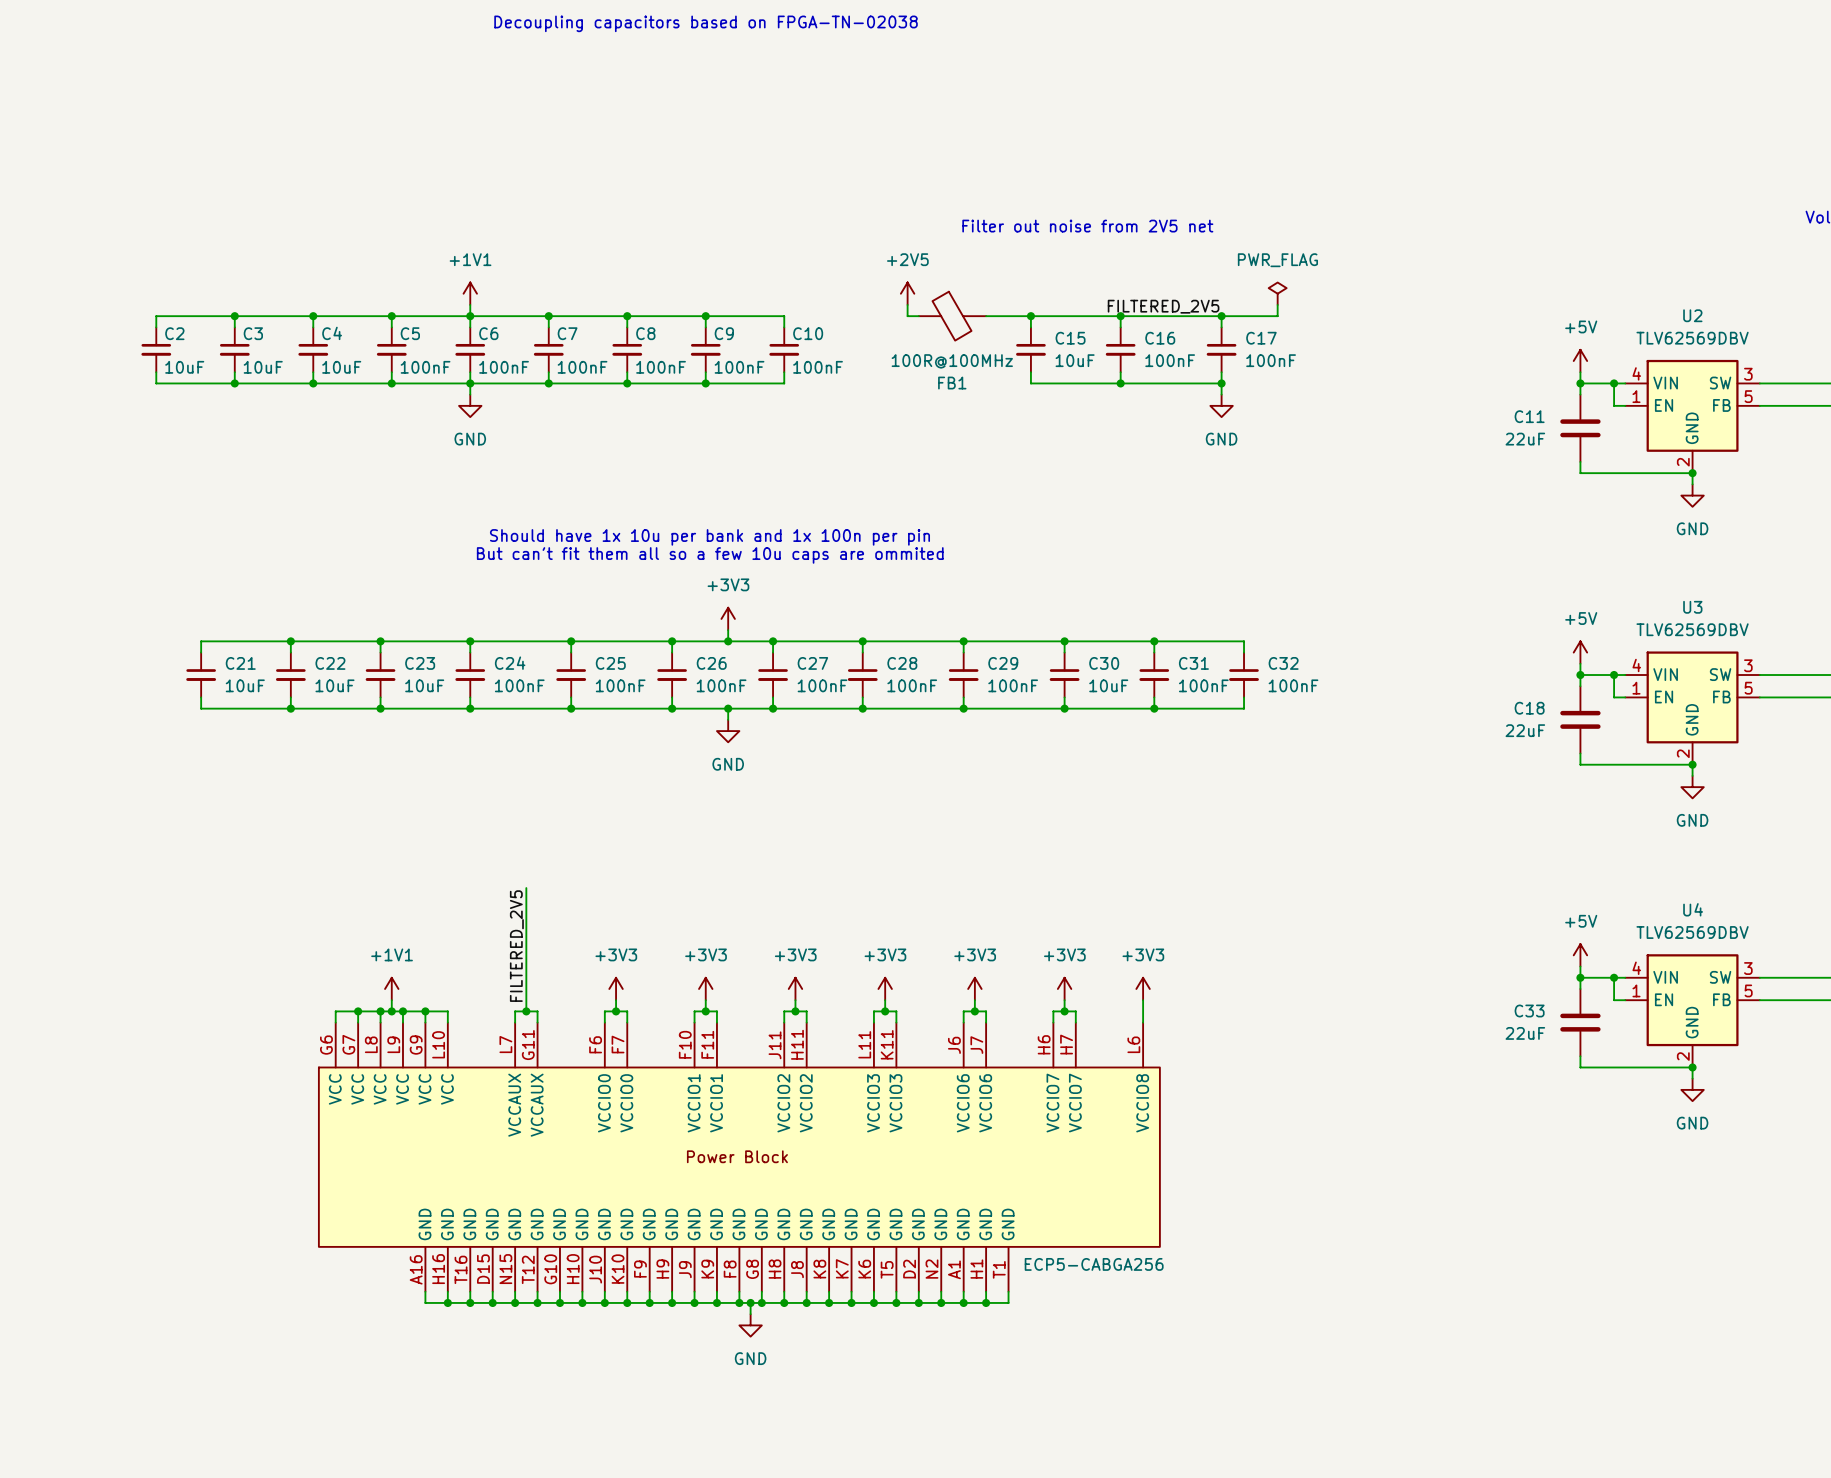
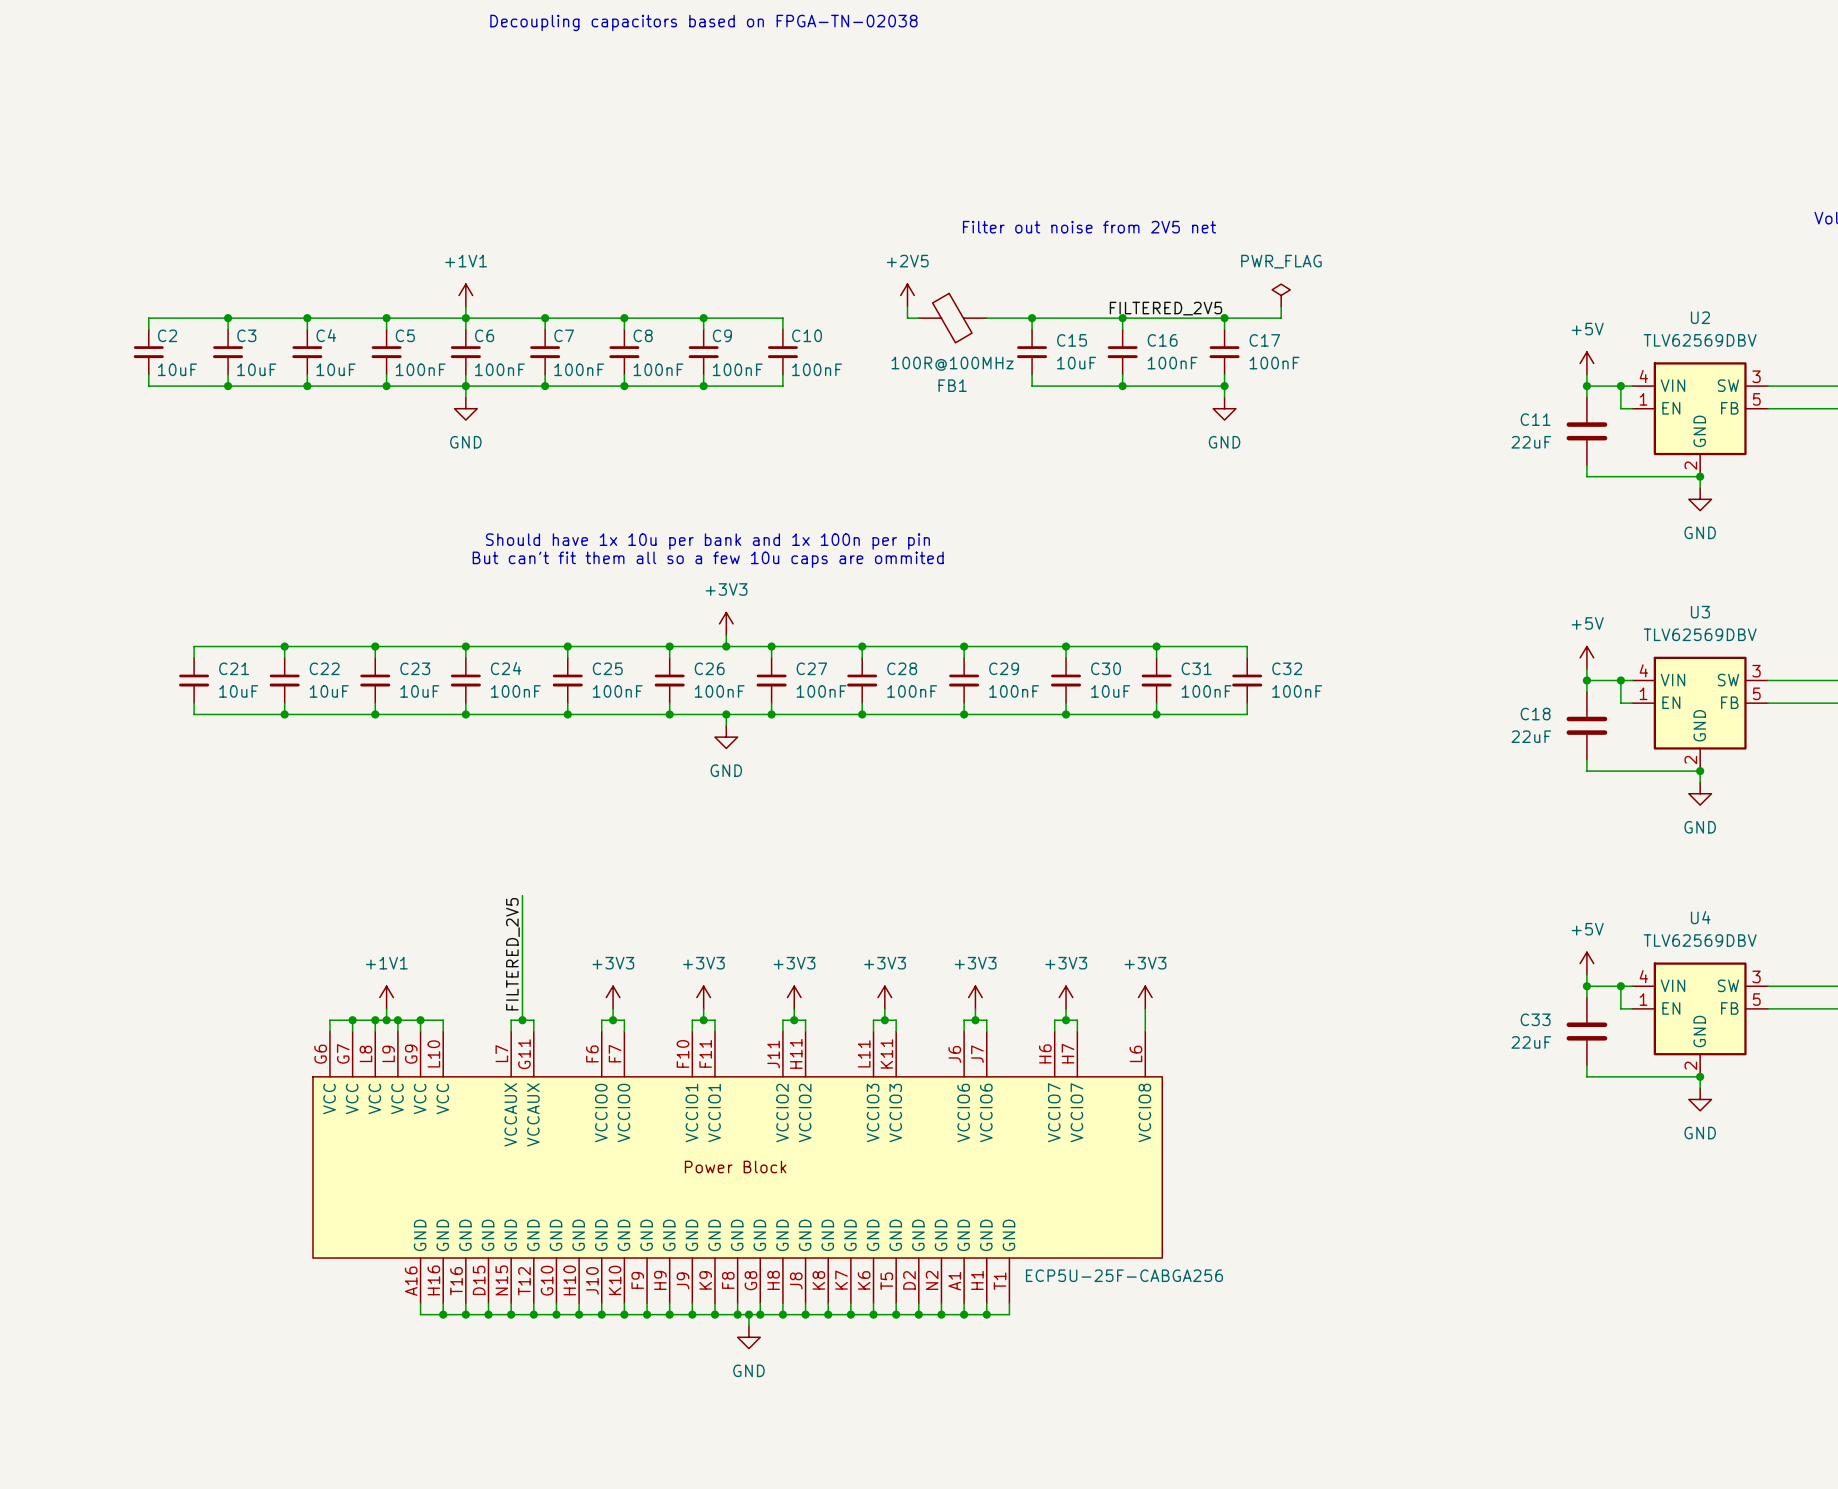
part value: ECP5-CABGA256 (1094, 1264) -> ECP5U-25F-CABGA256 (1124, 1275)

